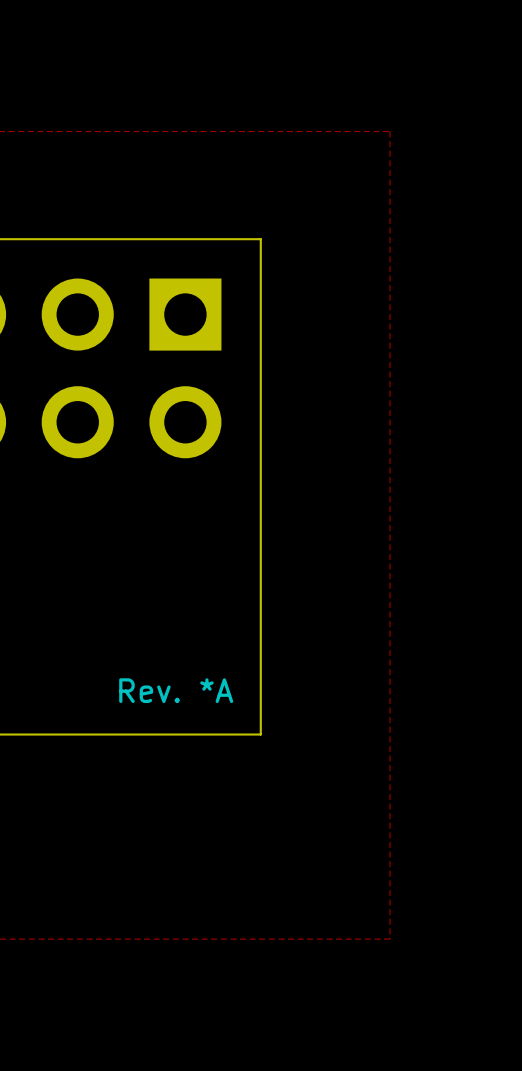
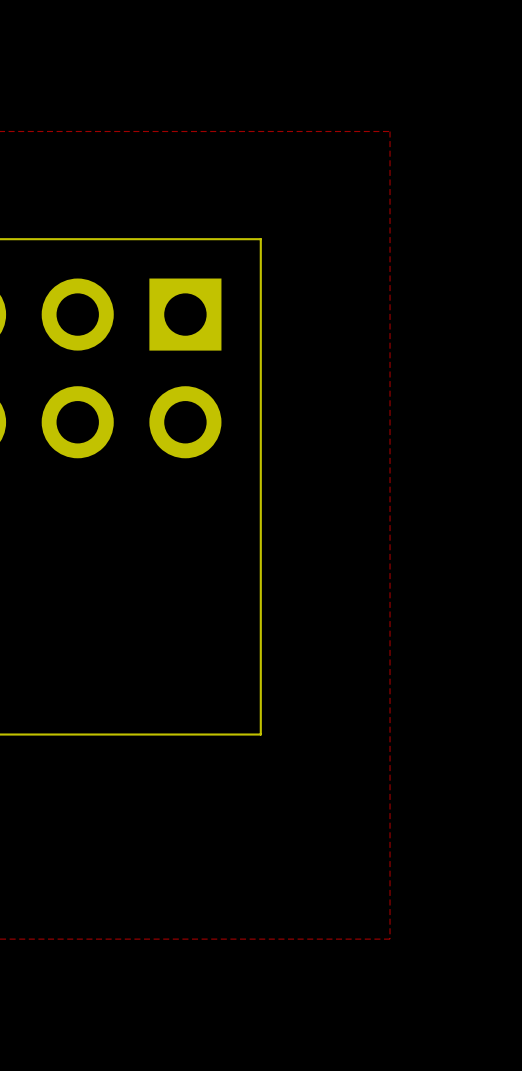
text: Rev. *A (176, 690) -> none

